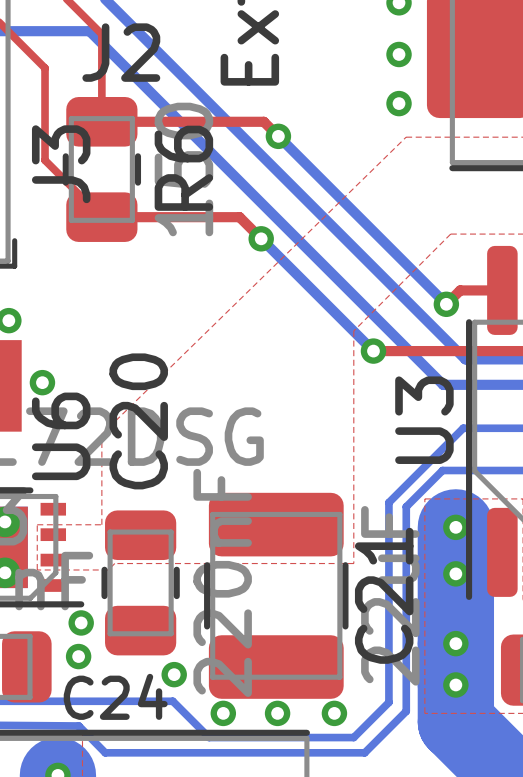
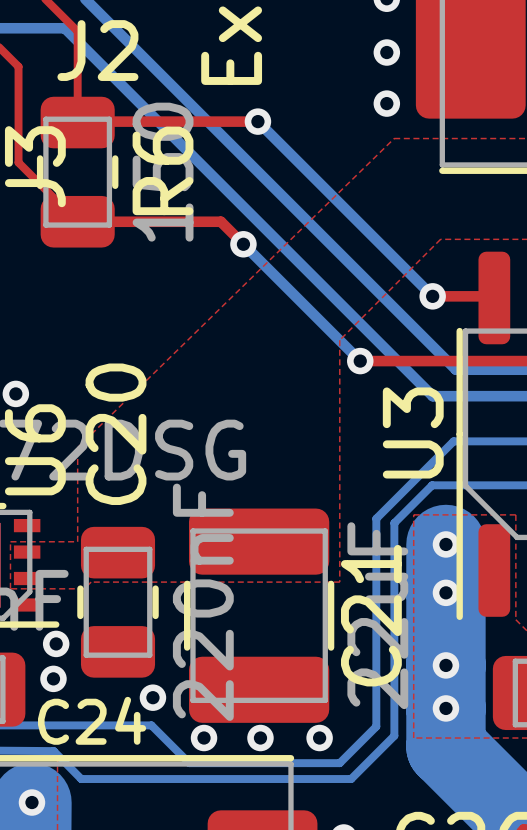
top track: (101, 121) (263, 121) (278, 136) -> (77, 122) (257, 121)
bottom track: (278, 136) (446, 304) -> (257, 121) (432, 296)
via position: (278, 136) -> (257, 121)
top track: (502, 290) (460, 290) (446, 304) -> (494, 297) (492, 296) (432, 296)
via position: (446, 304) -> (432, 296)

